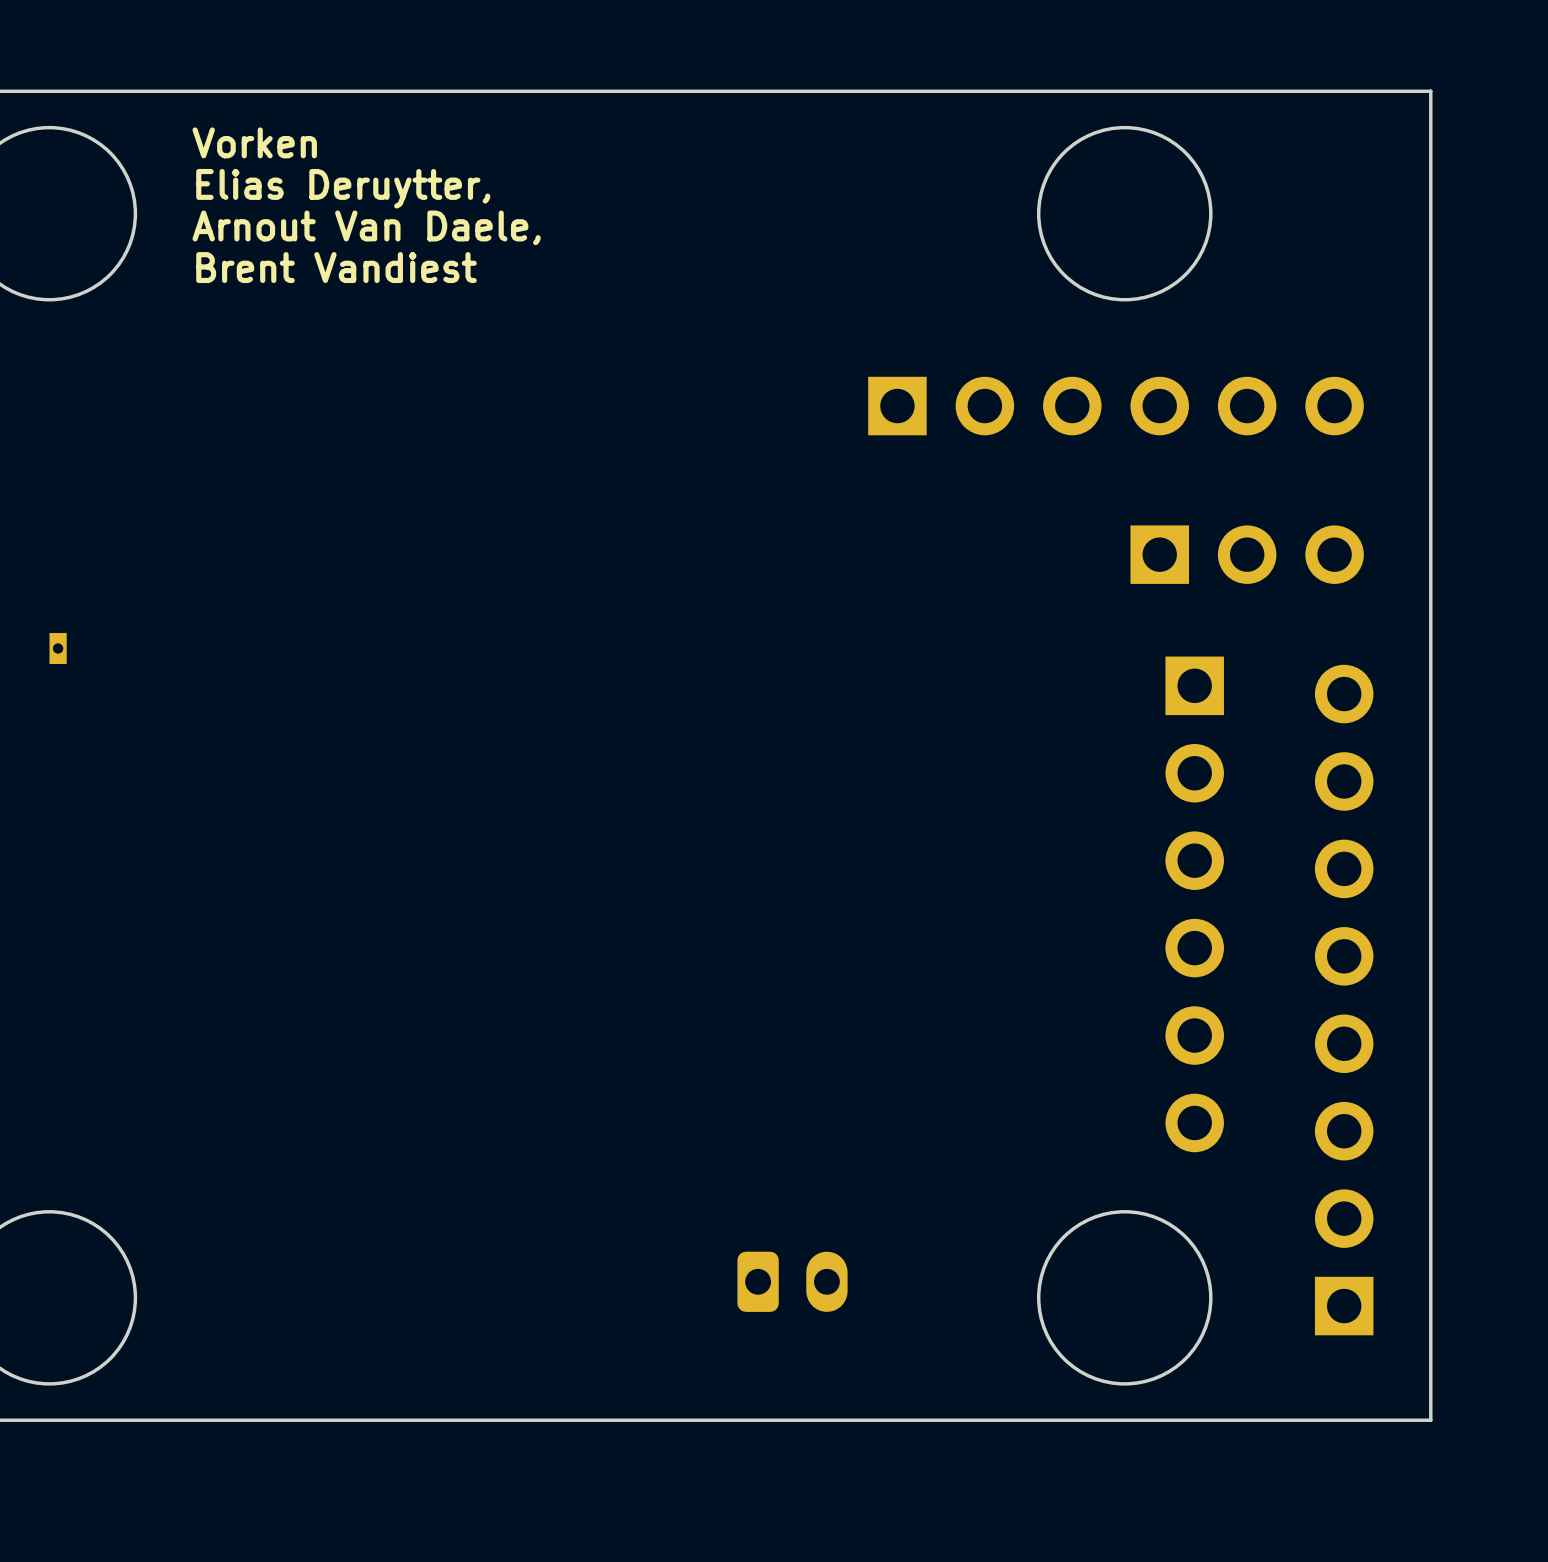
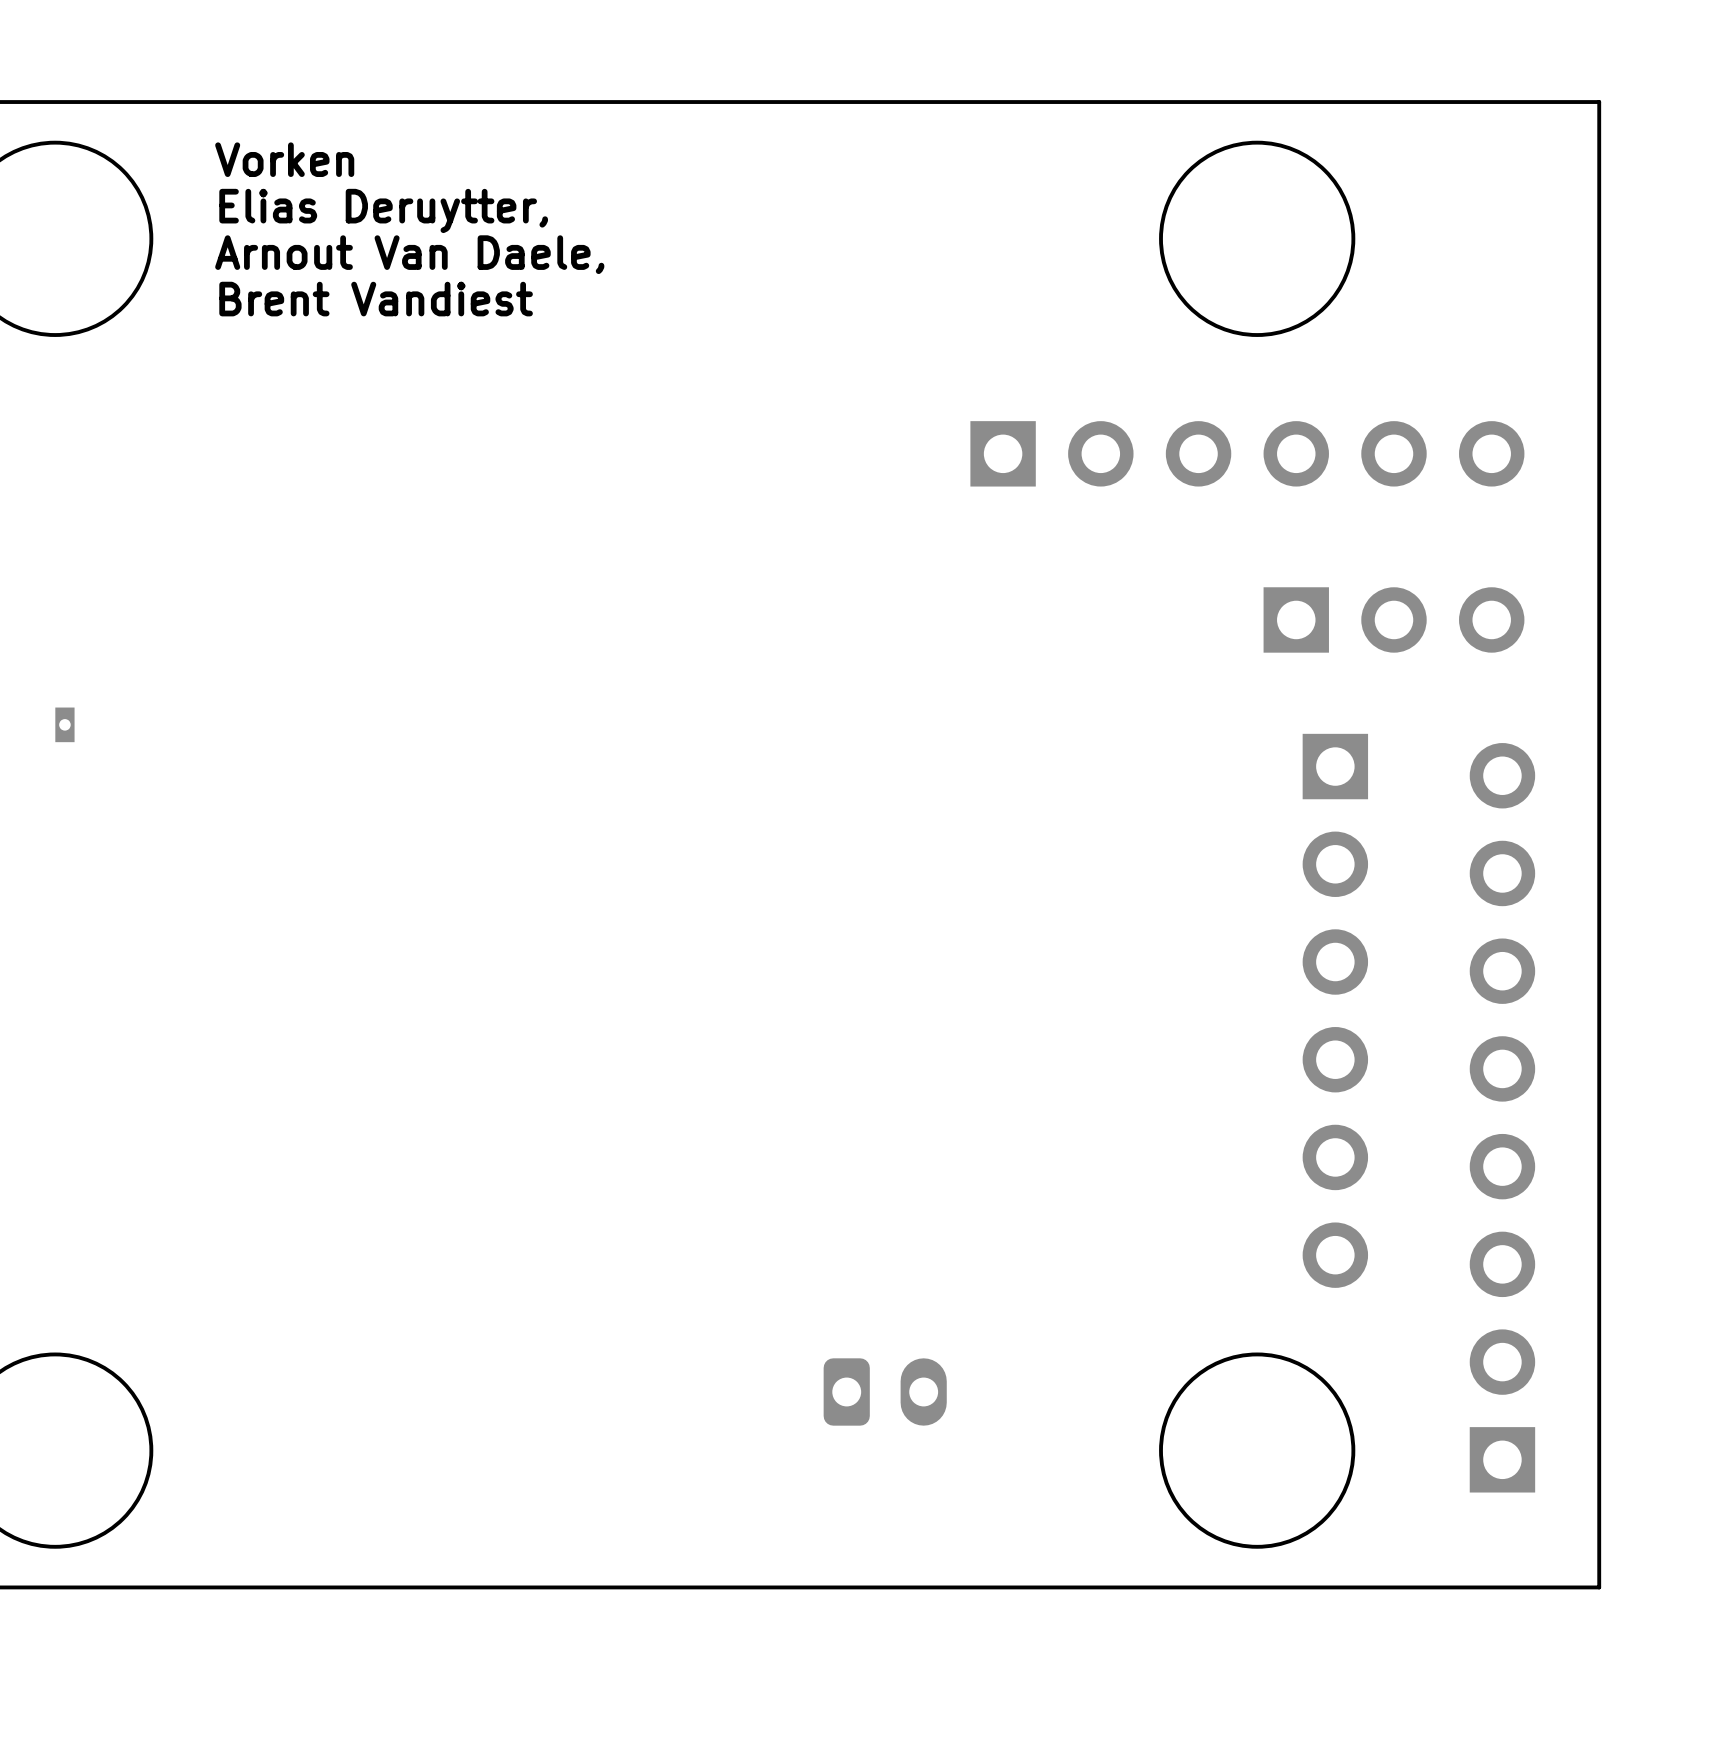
part position: (792, 1281) -> (885, 1391)

